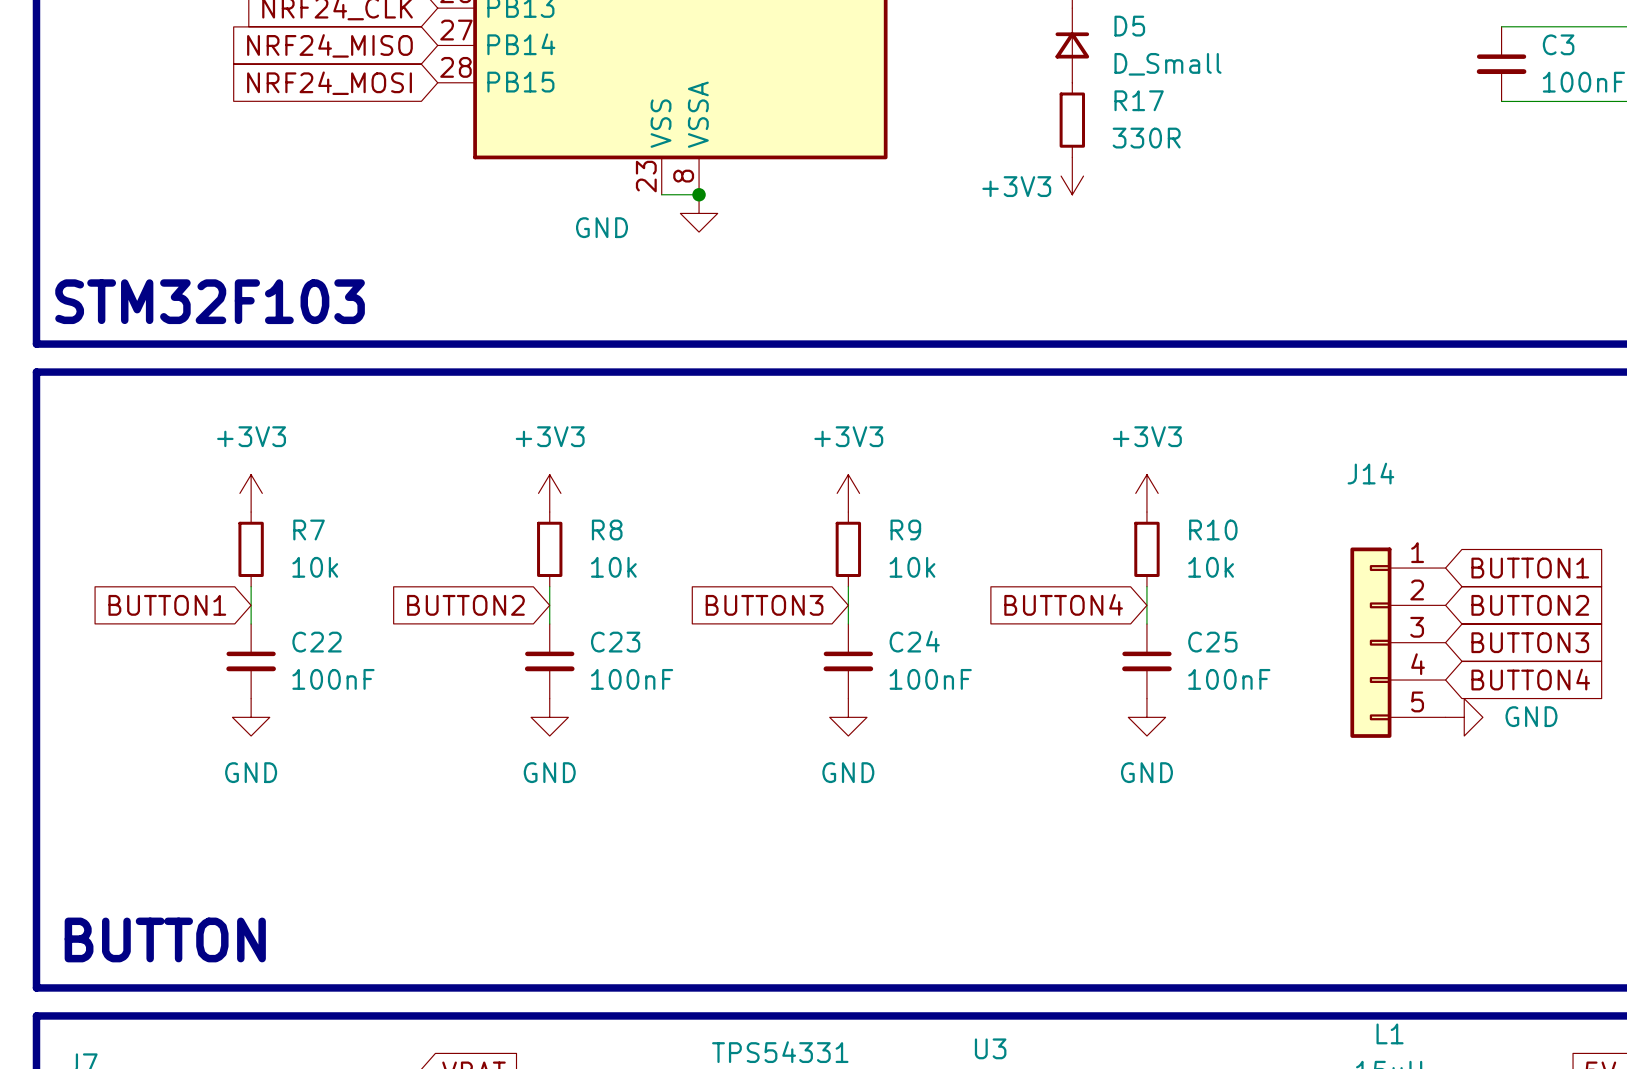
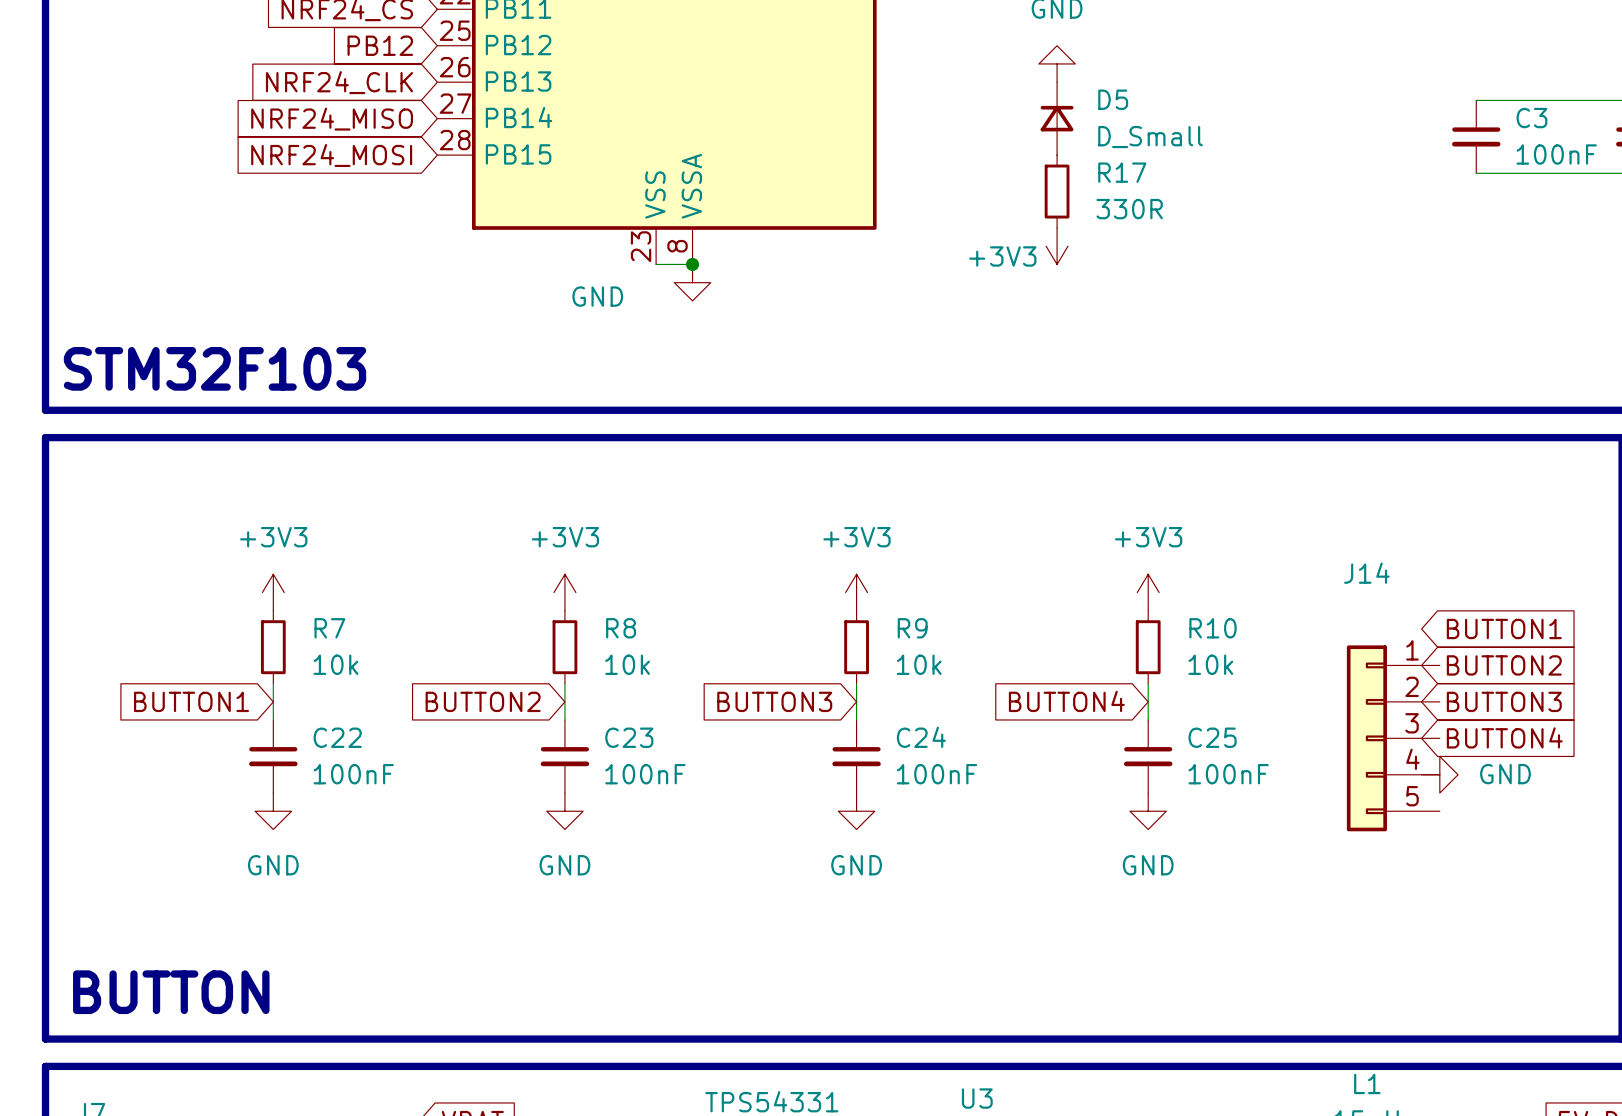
power symbol position: +3V3 (251, 493) -> +3V3 (273, 592)
power symbol position: +3V3 (549, 493) -> +3V3 (564, 592)
power symbol position: +3V3 (848, 493) -> +3V3 (856, 592)
power symbol position: +3V3 (1146, 493) -> +3V3 (1148, 592)
R7 position: (251, 549) -> (273, 647)
R8 position: (549, 549) -> (564, 647)
R9 position: (848, 549) -> (856, 647)
R10 position: (1146, 549) -> (1148, 647)
wire: (251, 586) (251, 624) -> (273, 683) (273, 720)
wire: (549, 586) (549, 624) -> (564, 683) (564, 720)
wire: (848, 586) (848, 624) -> (856, 683) (856, 720)
wire: (1146, 586) (1146, 624) -> (1148, 683) (1148, 720)
global label position: BUTTON4 (1063, 604) -> BUTTON4 (1066, 701)
global label position: BUTTON1 (167, 605) -> BUTTON1 (191, 701)
global label position: BUTTON2 (465, 605) -> BUTTON2 (483, 701)
global label position: BUTTON3 (764, 605) -> BUTTON3 (774, 701)
J14 position: (1397, 642) -> (1393, 738)
C22 position: (251, 661) -> (273, 756)
C23 position: (549, 661) -> (564, 756)
C24 position: (848, 661) -> (856, 756)
C25 position: (1146, 661) -> (1148, 756)
power symbol position: GND (251, 717) -> GND (273, 811)
power symbol position: GND (549, 717) -> GND (564, 811)
power symbol position: GND (848, 717) -> GND (856, 811)
power symbol position: GND (1146, 717) -> GND (1148, 811)

